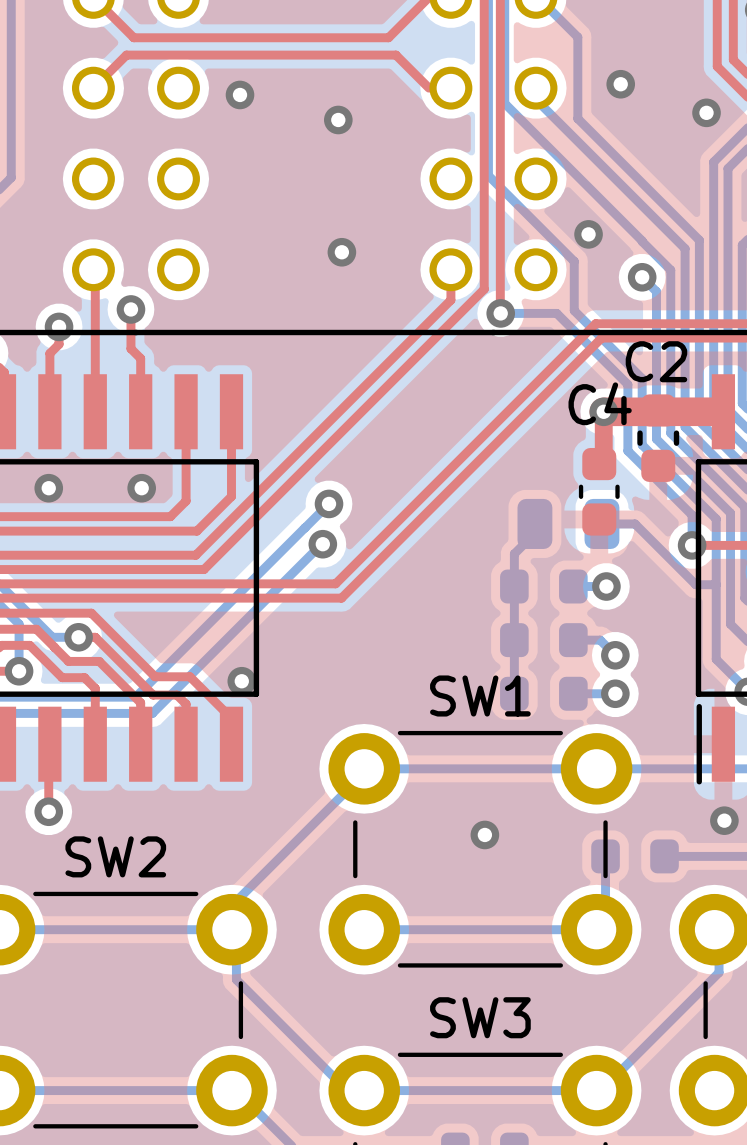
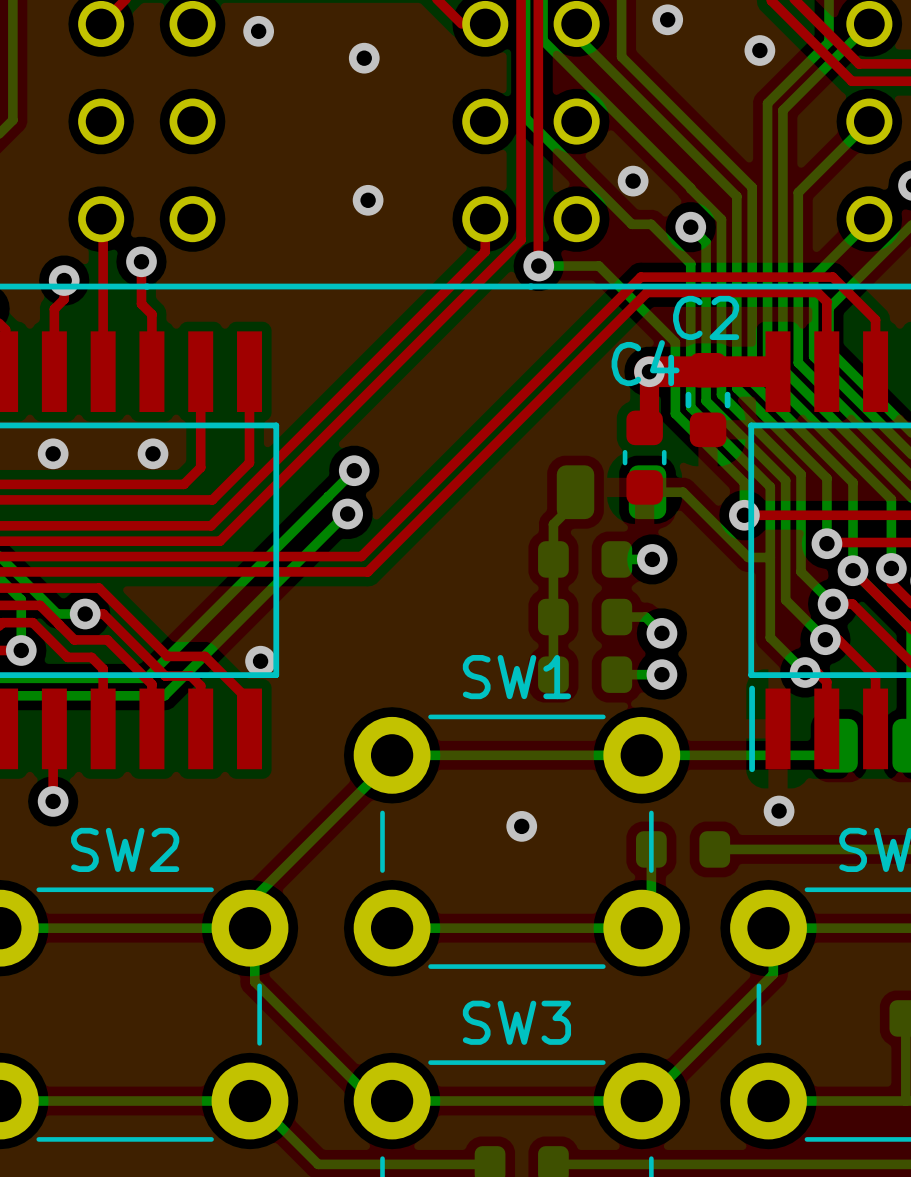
bottom track: (574, 261) (574, 310) (642, 378) -> (617, 210) (631, 224) (651, 224) (690, 263) (690, 336)

